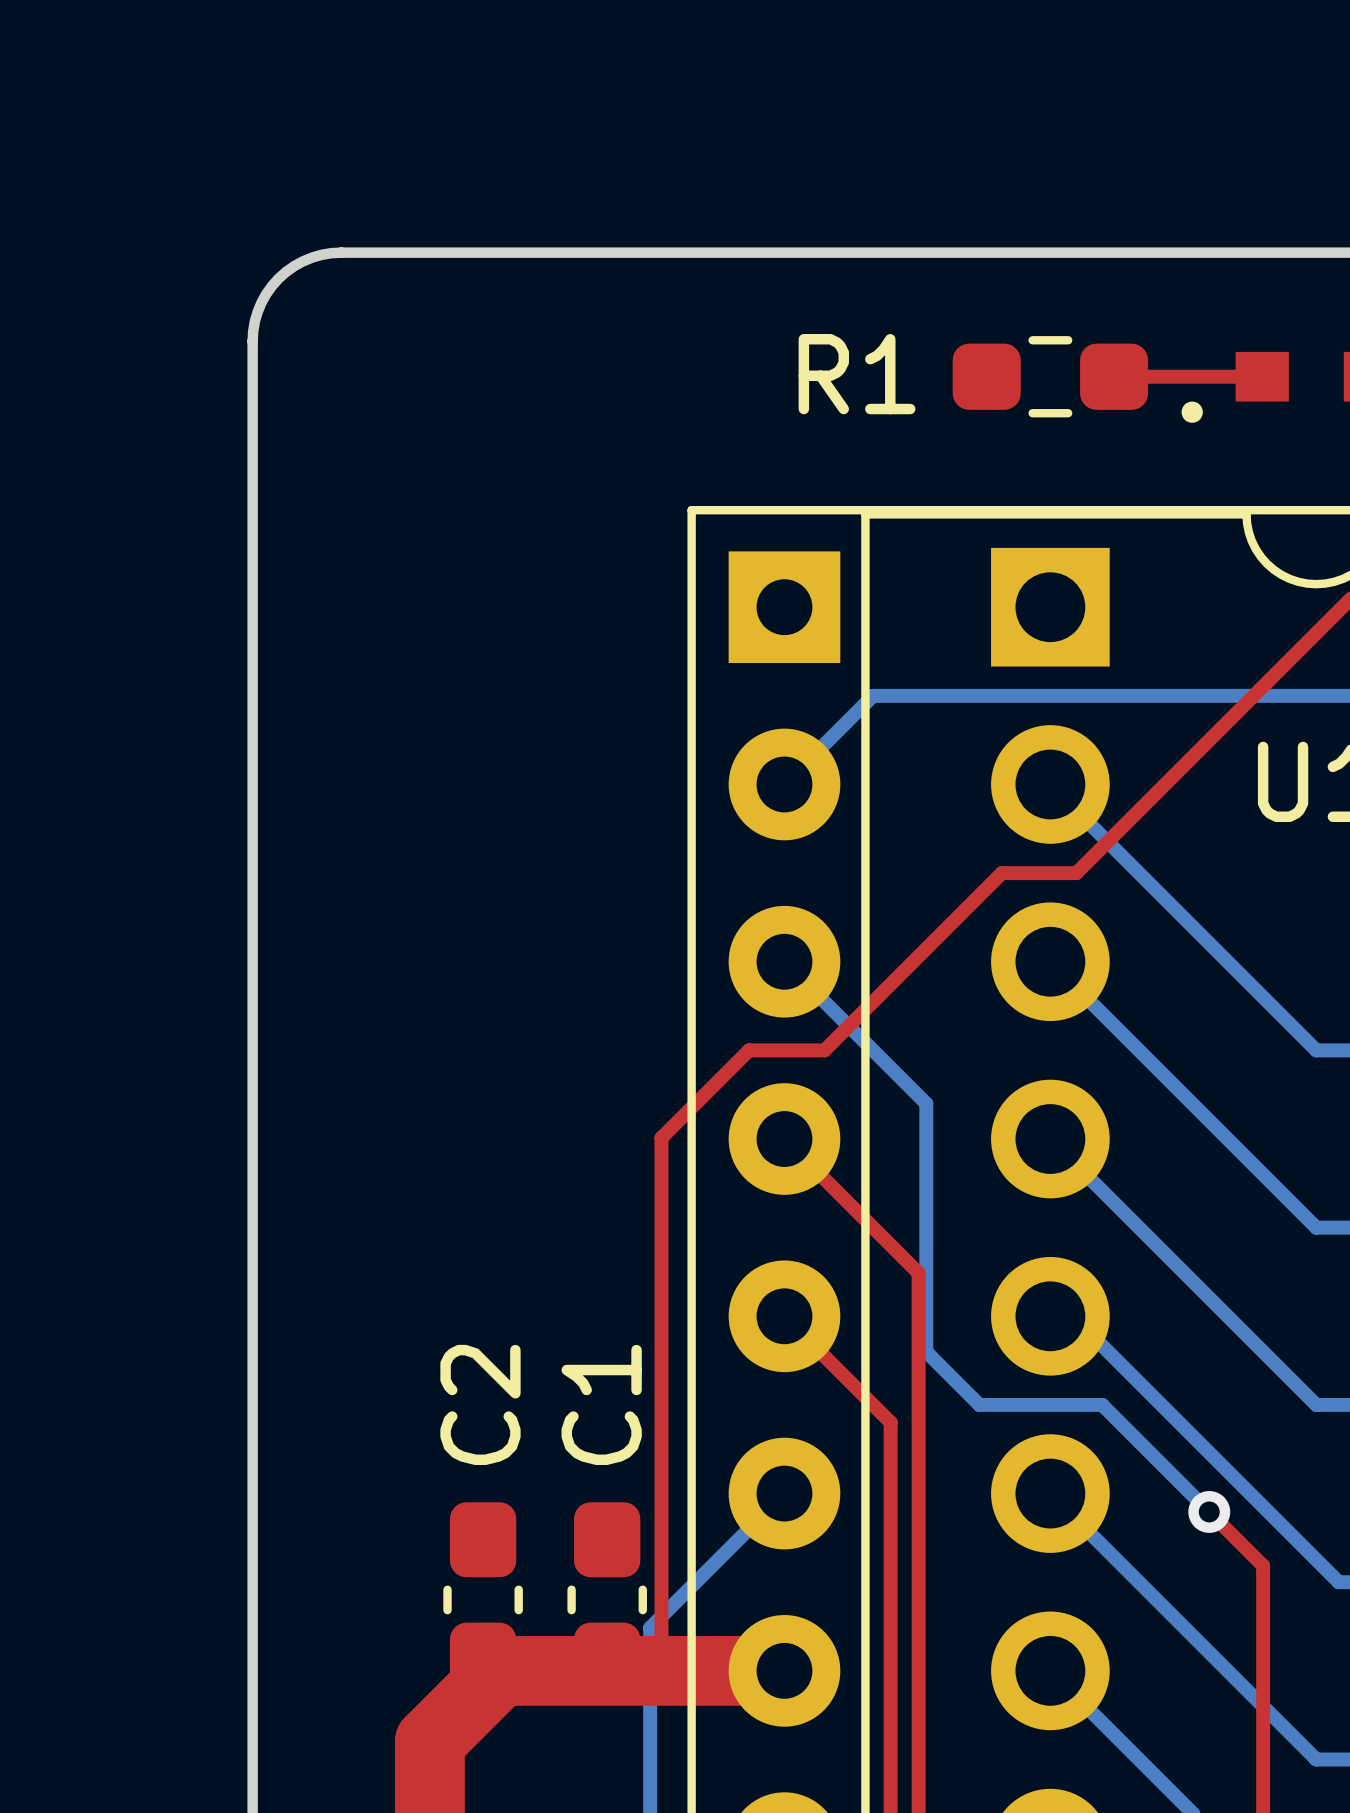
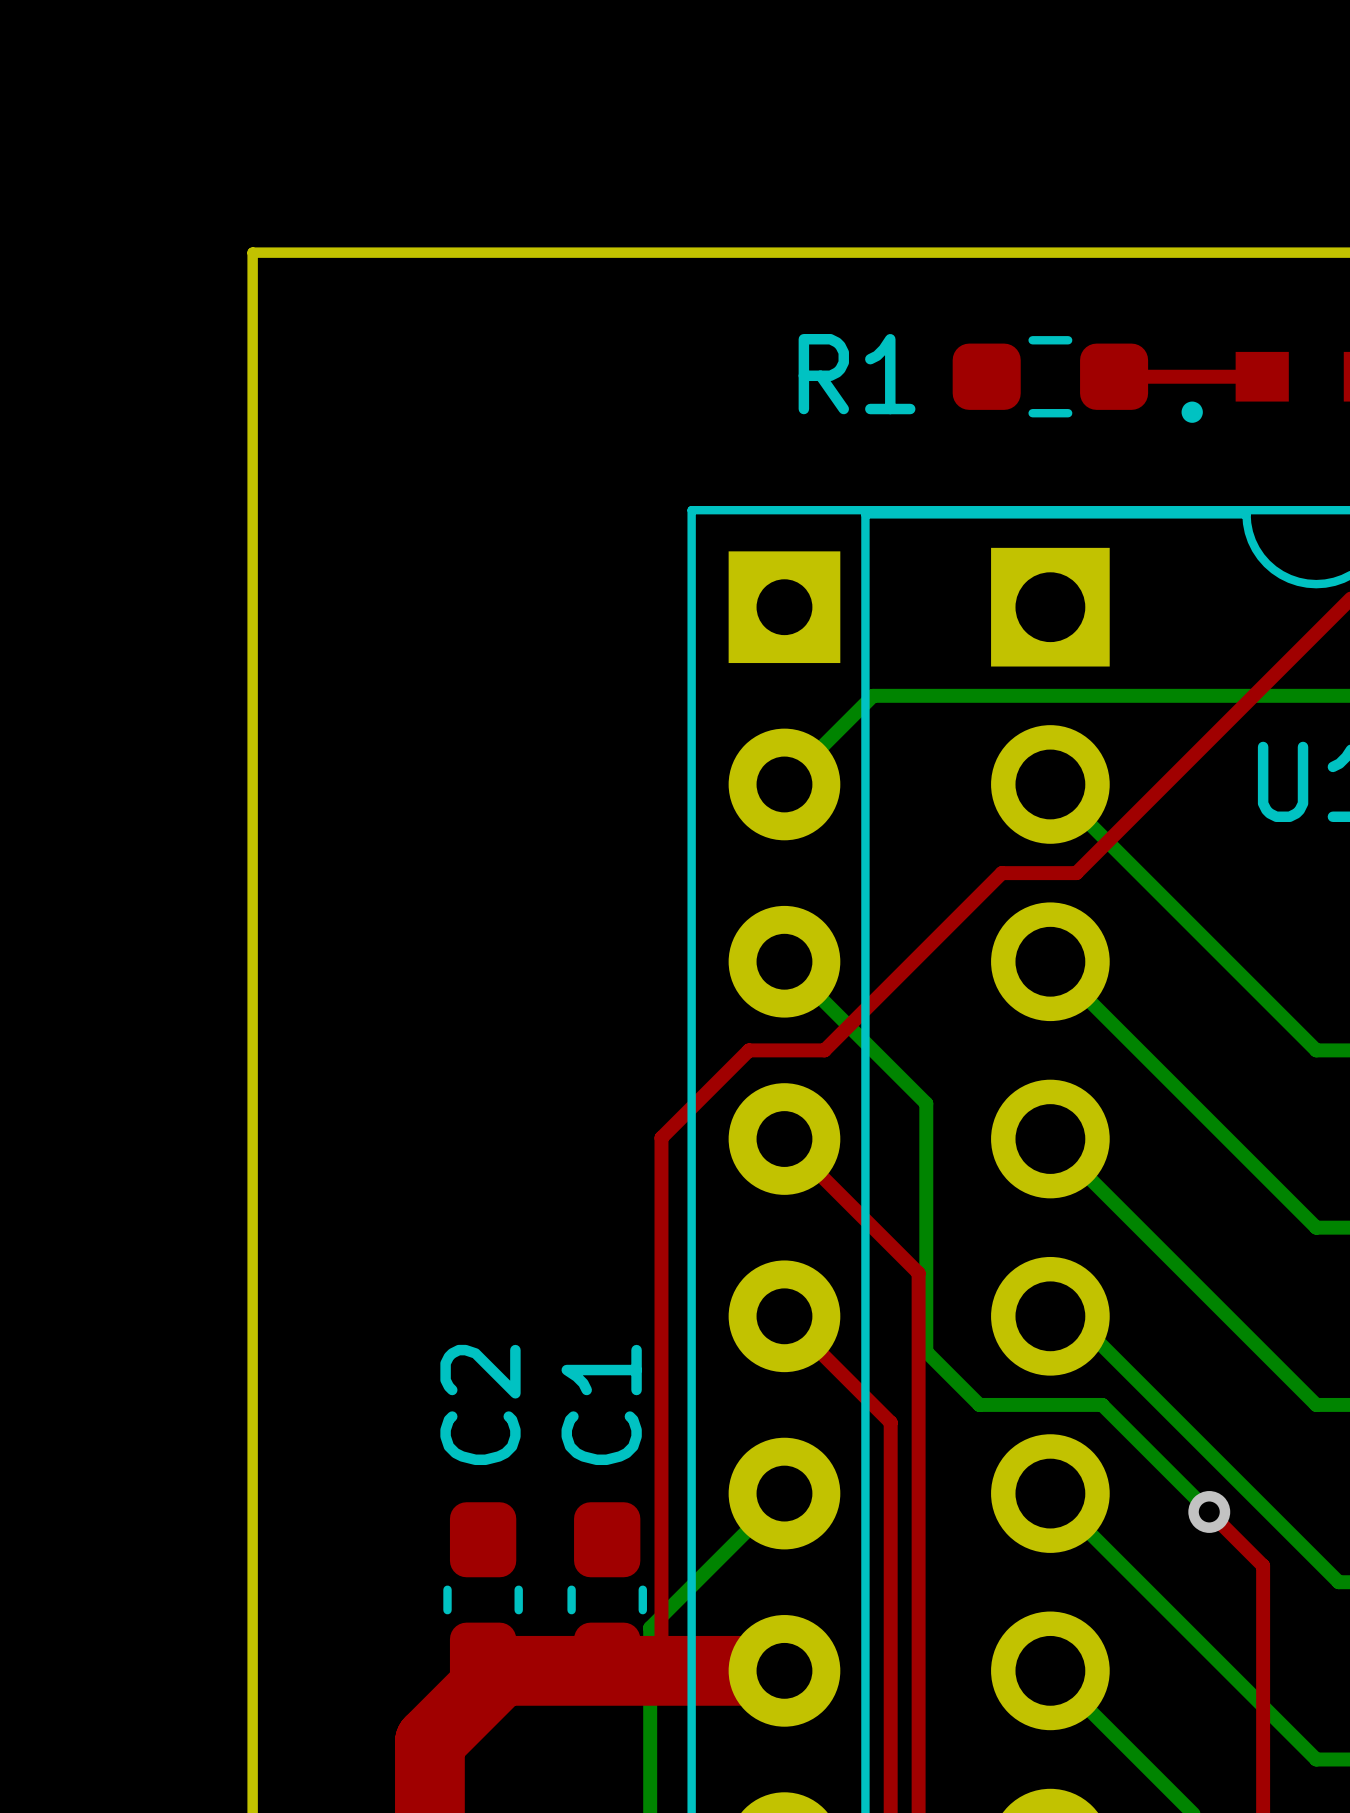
board edge: (341, 252) (312, 257) (294, 266) (278, 278) (261, 302) (254, 321) (252, 341) -> (341, 252) (252, 252) (252, 341)

